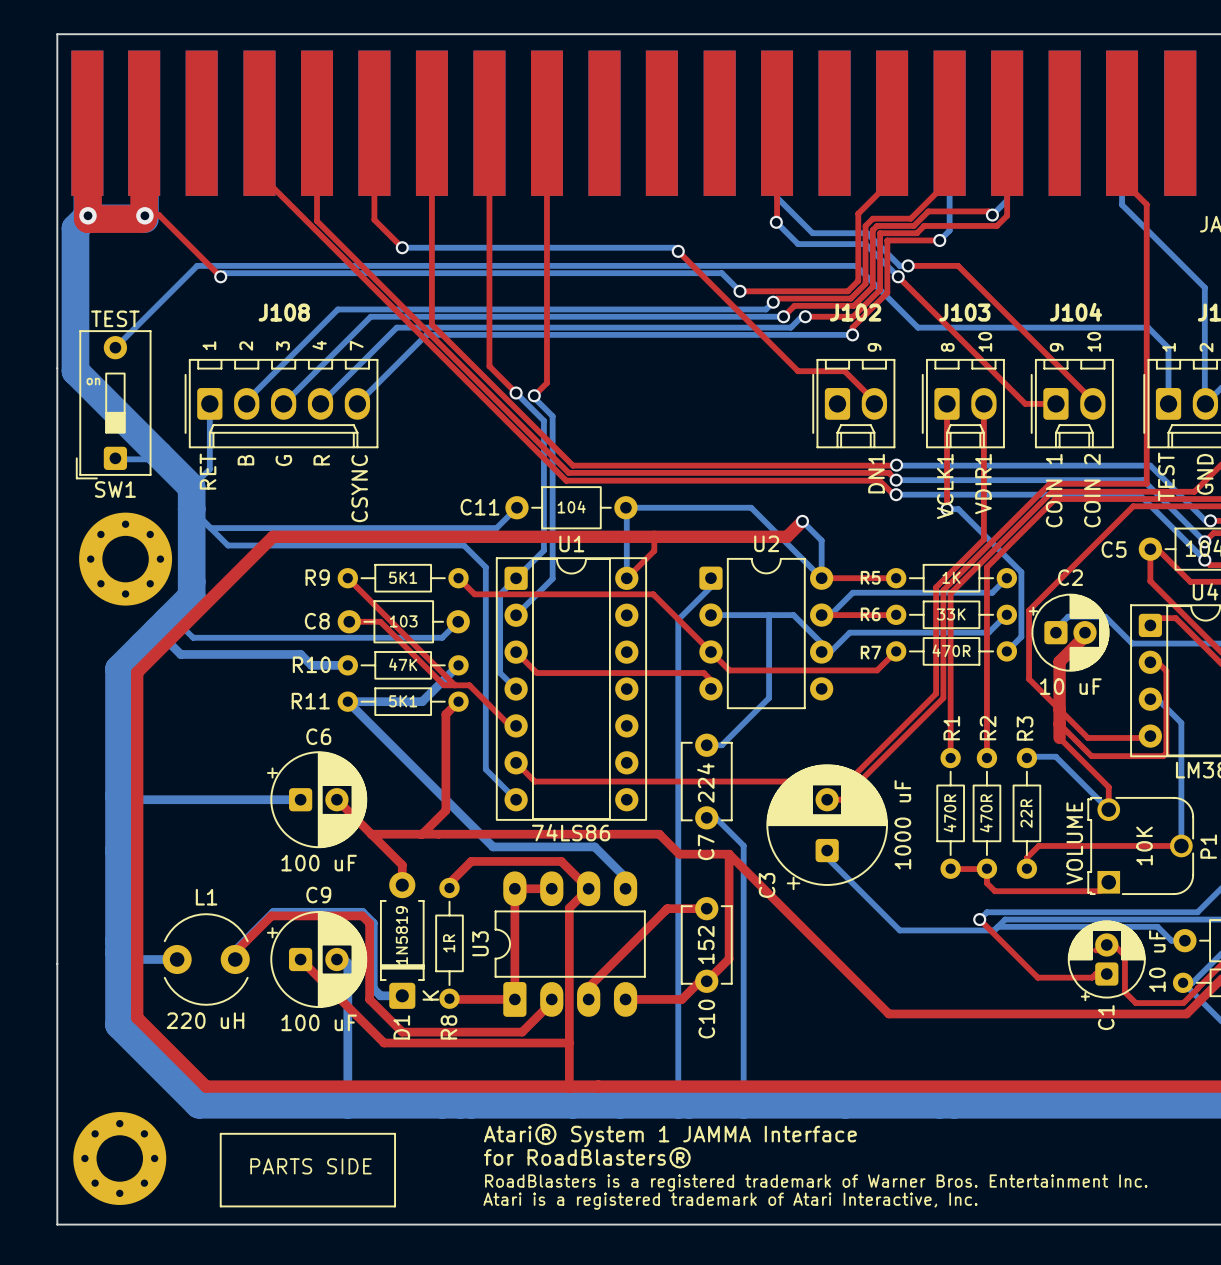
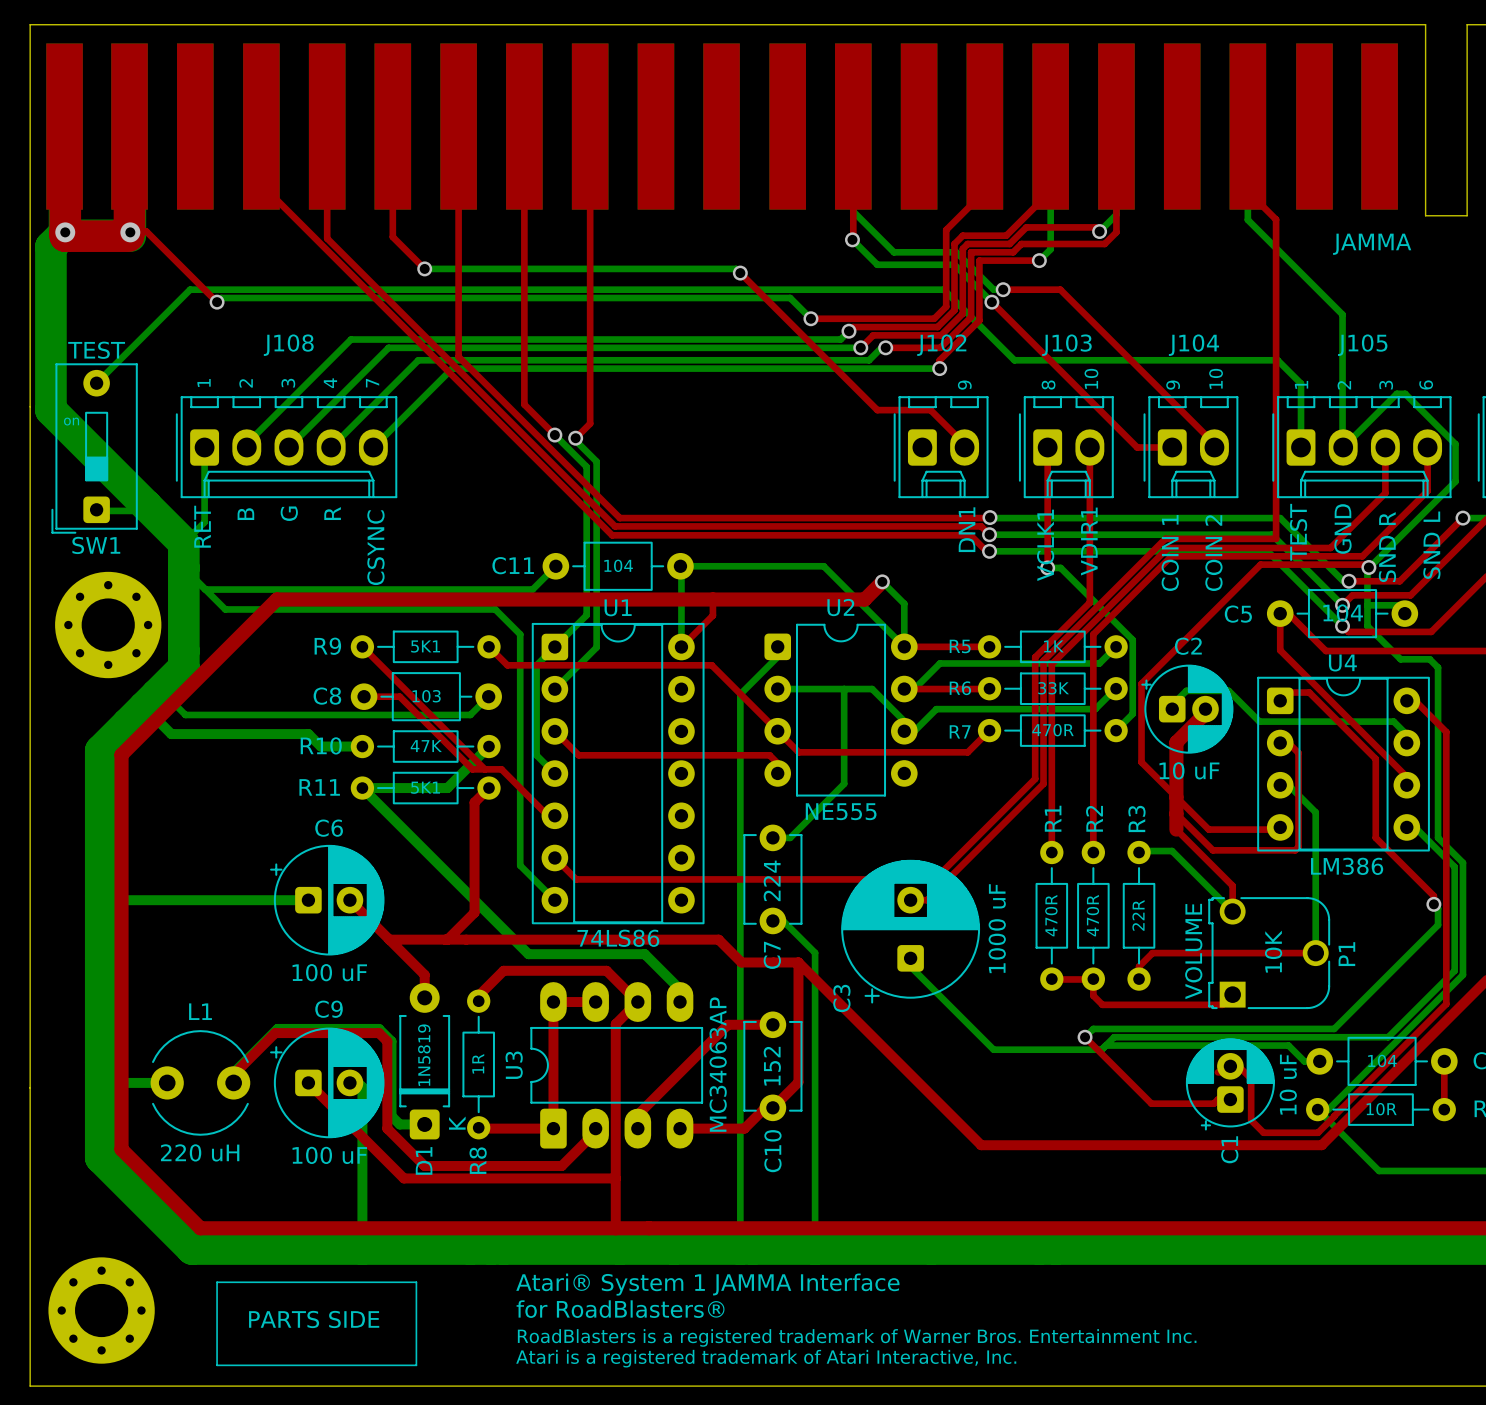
U2 value: none -> NE555 (841, 811)
U3 value: none -> MC34063AP (718, 1064)

